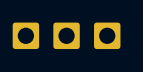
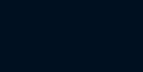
part: (25, 35) -> none
part: (66, 35) -> none
part: (107, 35) -> none

